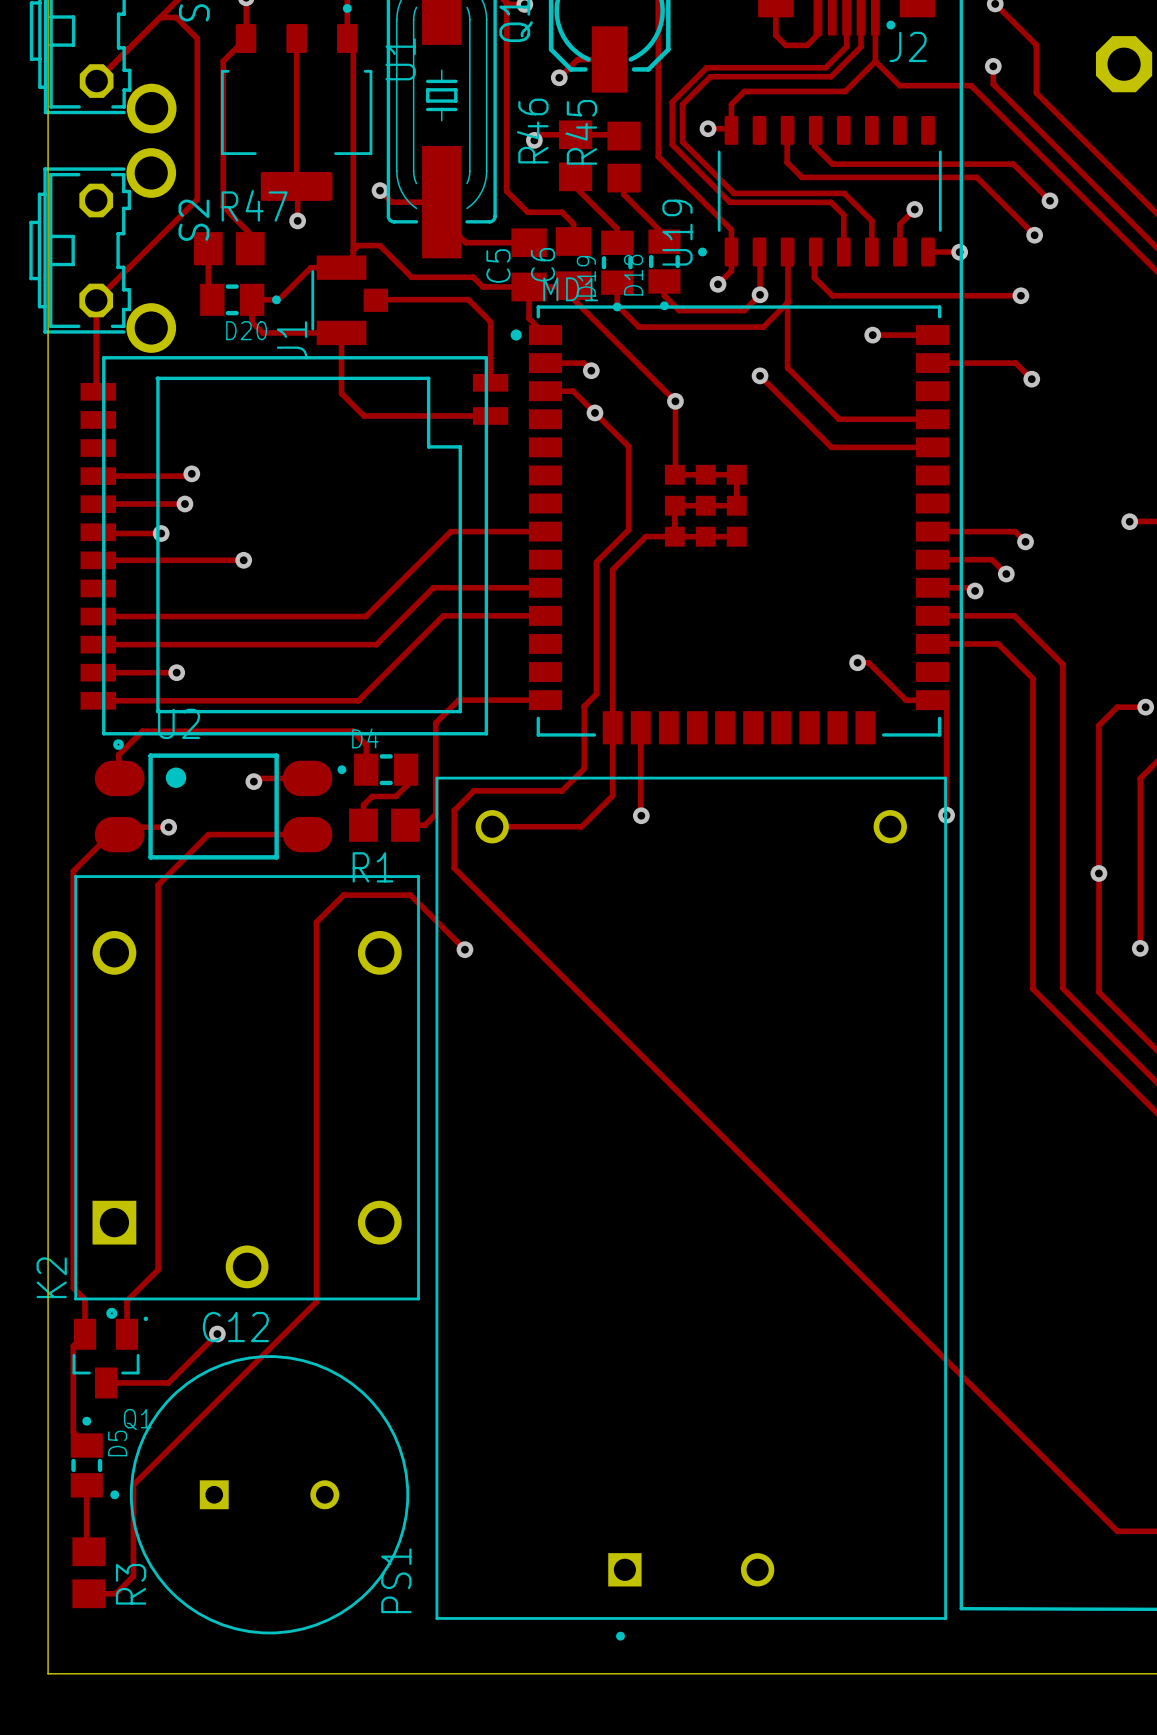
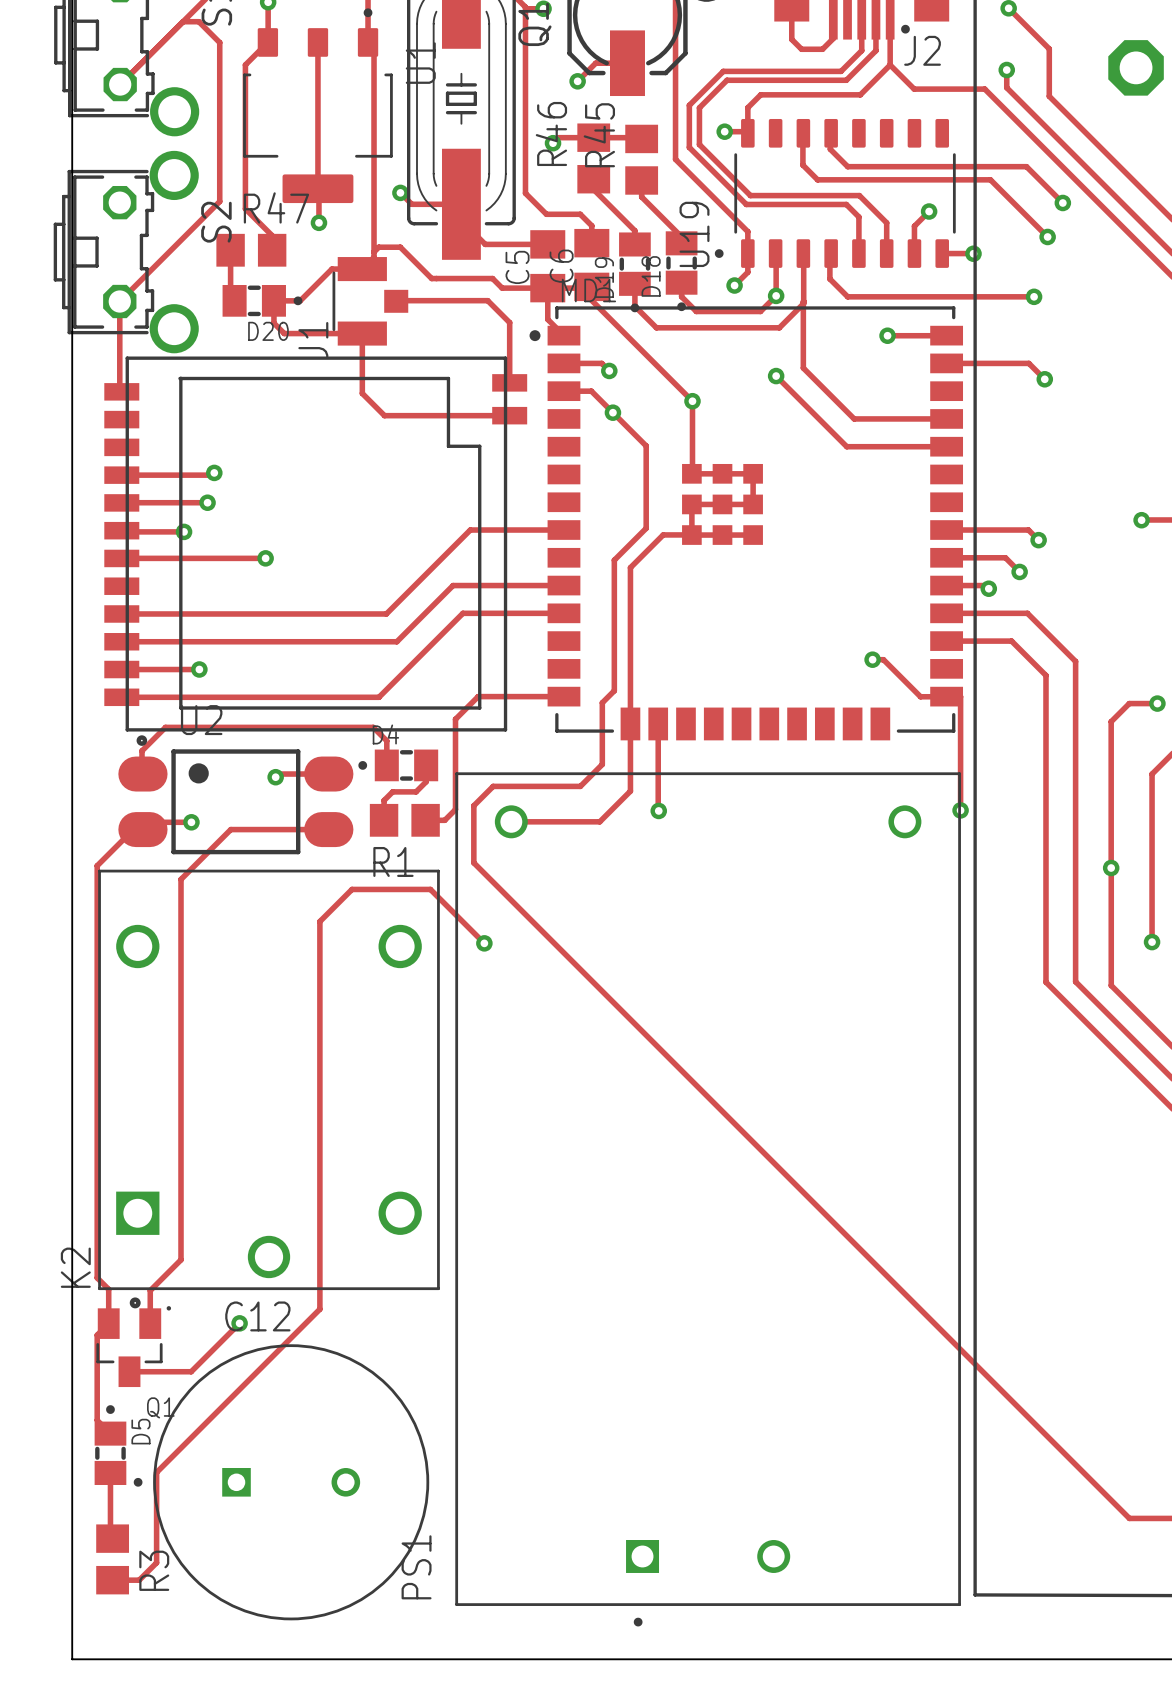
track: (343, 895) (316, 922) (316, 1301) (298, 1319) -> (364, 889) (352, 889) (319, 921) (319, 1309)

